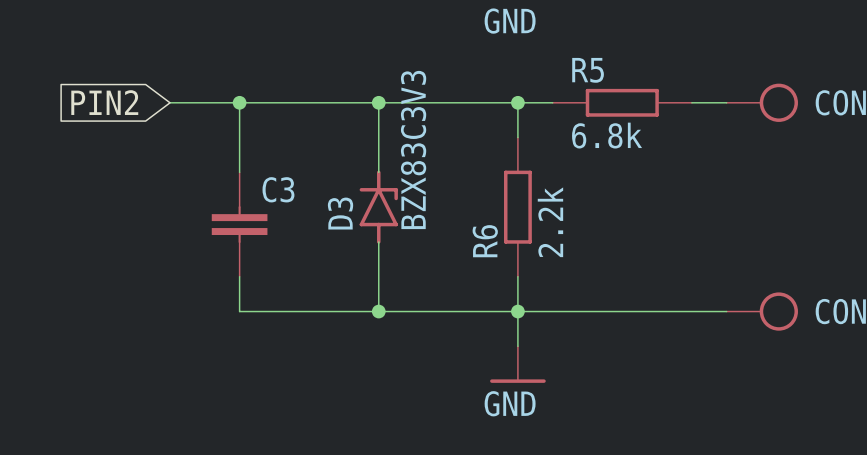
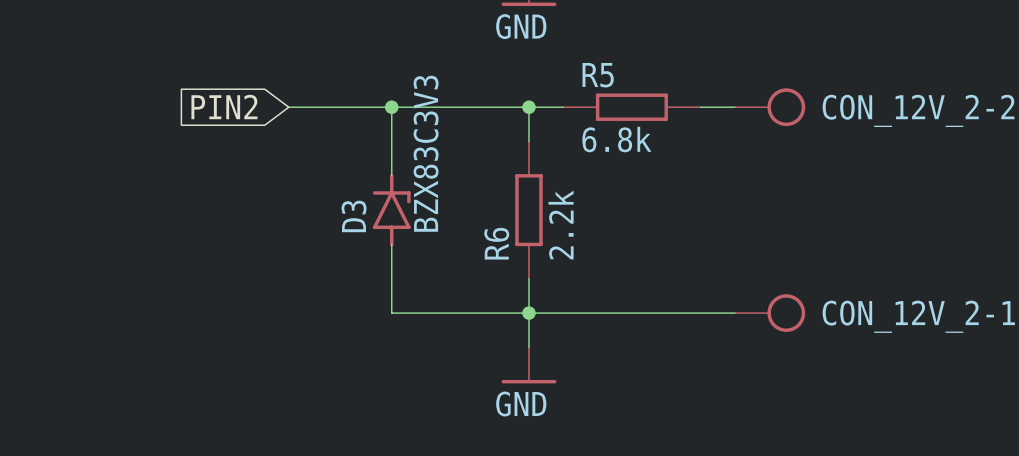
global label position: PIN2 (104, 102) -> PIN2 (224, 107)
wire: (170, 102) (274, 102) -> none
wire: (239, 102) (239, 172) -> none
junction: (239, 102) -> none
C3: (239, 224) -> none
wire: (239, 276) (239, 311) (378, 311) -> none
junction: (378, 311) -> none

